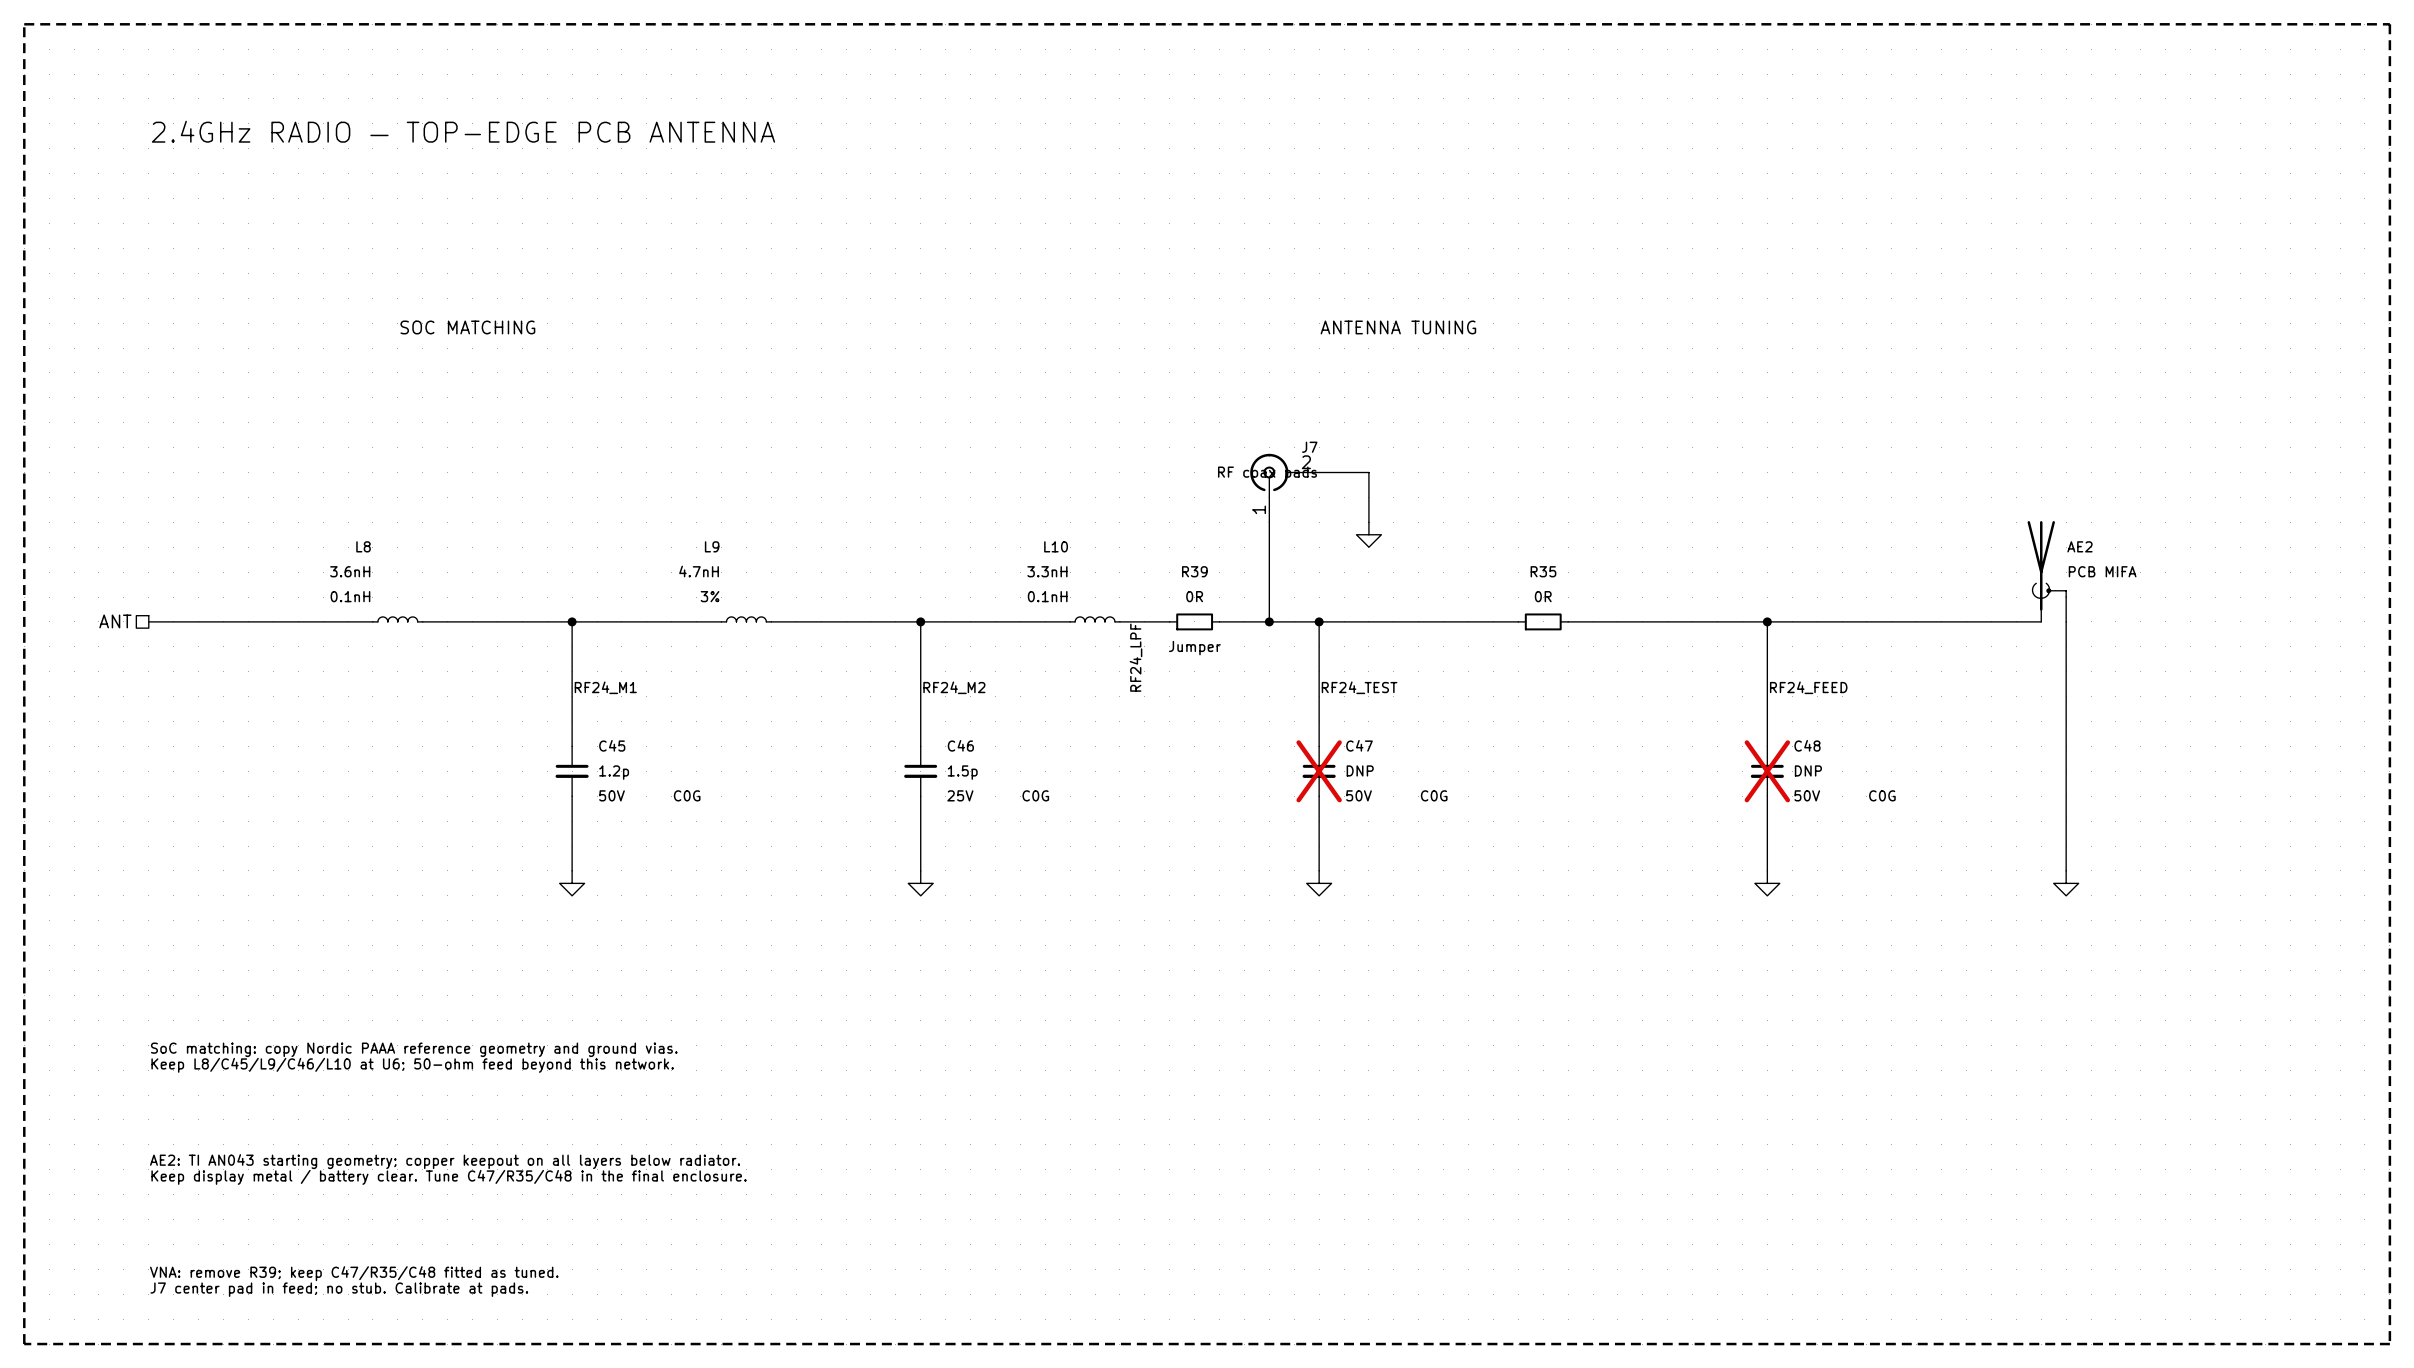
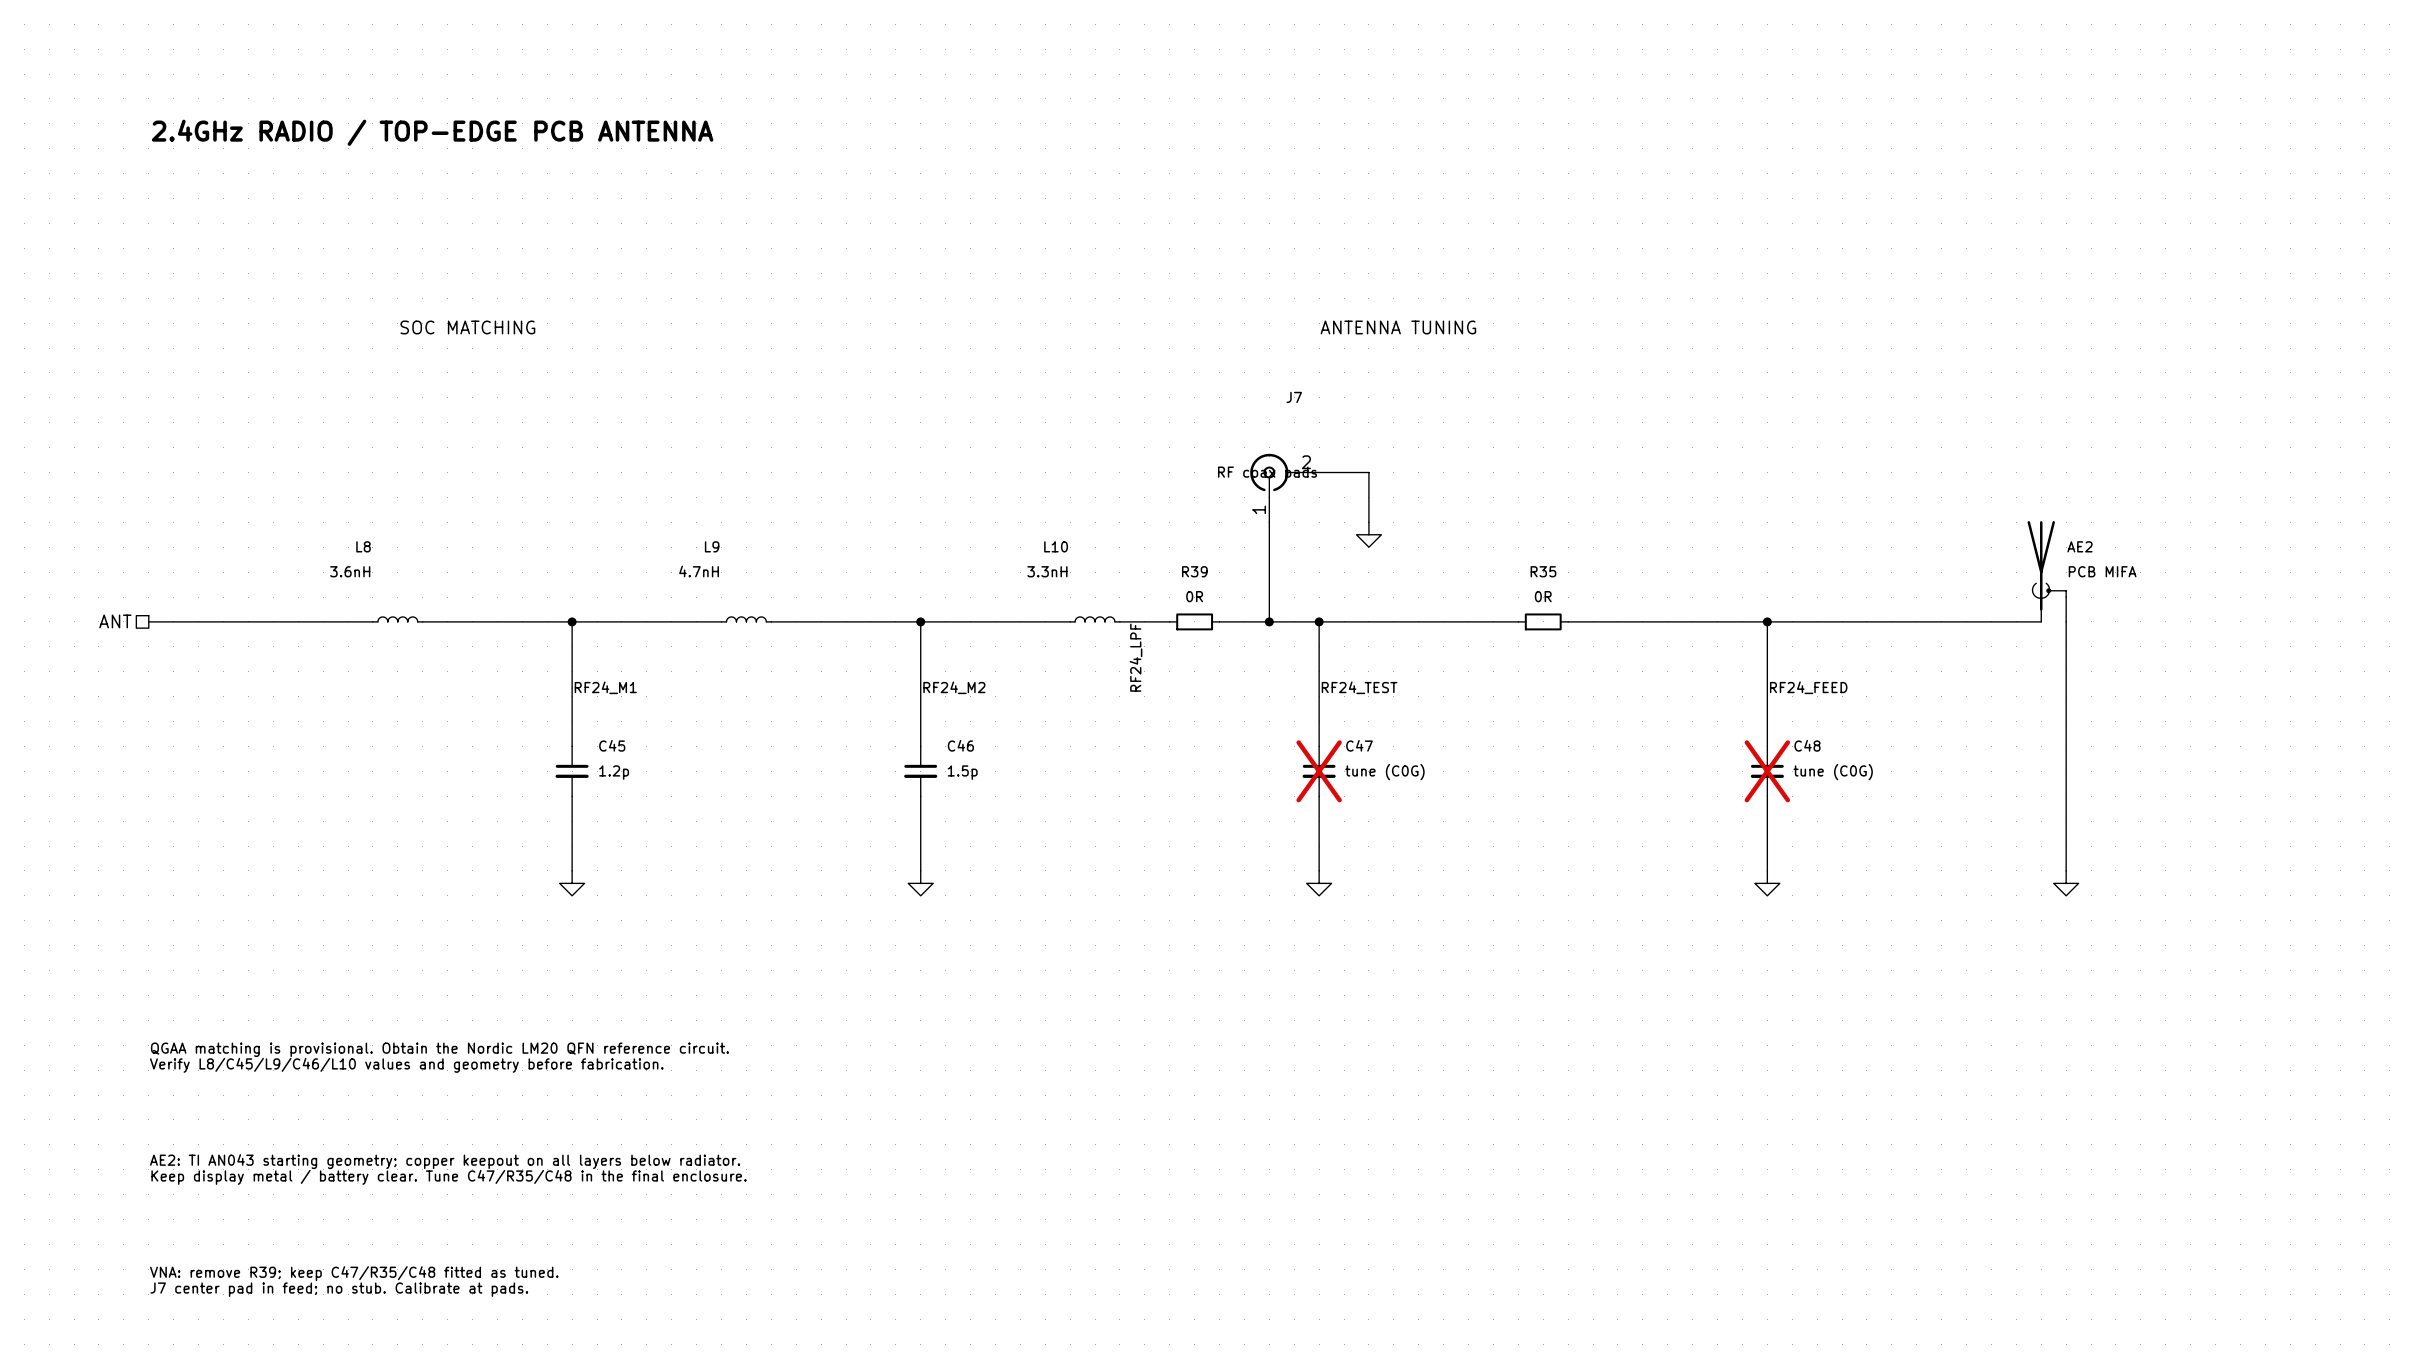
line: (24, 24) (2389, 24) (2389, 1344) (24, 1344) (24, 24) -> none
text: 2.4GHz RADIO — TOP-EDGE PCB ANTENNA (463, 131) -> 2.4GHz RADIO / TOP-EDGE PCB ANTENNA (432, 132)
J7 name position: J7 (1309, 447) -> J7 (1294, 397)
L8 text: 0.1nH (350, 596) -> none
L9 text: 3% (710, 596) -> none
L10 text: 0.1nH (1047, 596) -> none
R39 text: Jumper (1194, 648) -> none
C47 value: DNP (1360, 770) -> tune (C0G) (1384, 772)
C48 value: DNP (1808, 770) -> tune (C0G) (1833, 772)
C45 text: 50V (612, 795) -> none
C45 text: C0G (687, 795) -> none
C46 text: 25V (960, 795) -> none
C46 text: C0G (1035, 795) -> none
C47 text: 50V (1359, 795) -> none
C47 text: C0G (1434, 795) -> none
C48 text: 50V (1807, 795) -> none
C48 text: C0G (1882, 795) -> none
text: SoC matching: copy Nordic PAAA reference geometry and ground vias. (414, 1049) -> QGAA matching is provisional. Obtain the Nordic LM20 QFN reference circuit. (439, 1049)
text: Keep L8/C45/L9/C46/L10 at U6; 50-ohm feed beyond this network. (412, 1065) -> Verify L8/C45/L9/C46/L10 values and geometry before fabrication. (406, 1065)

